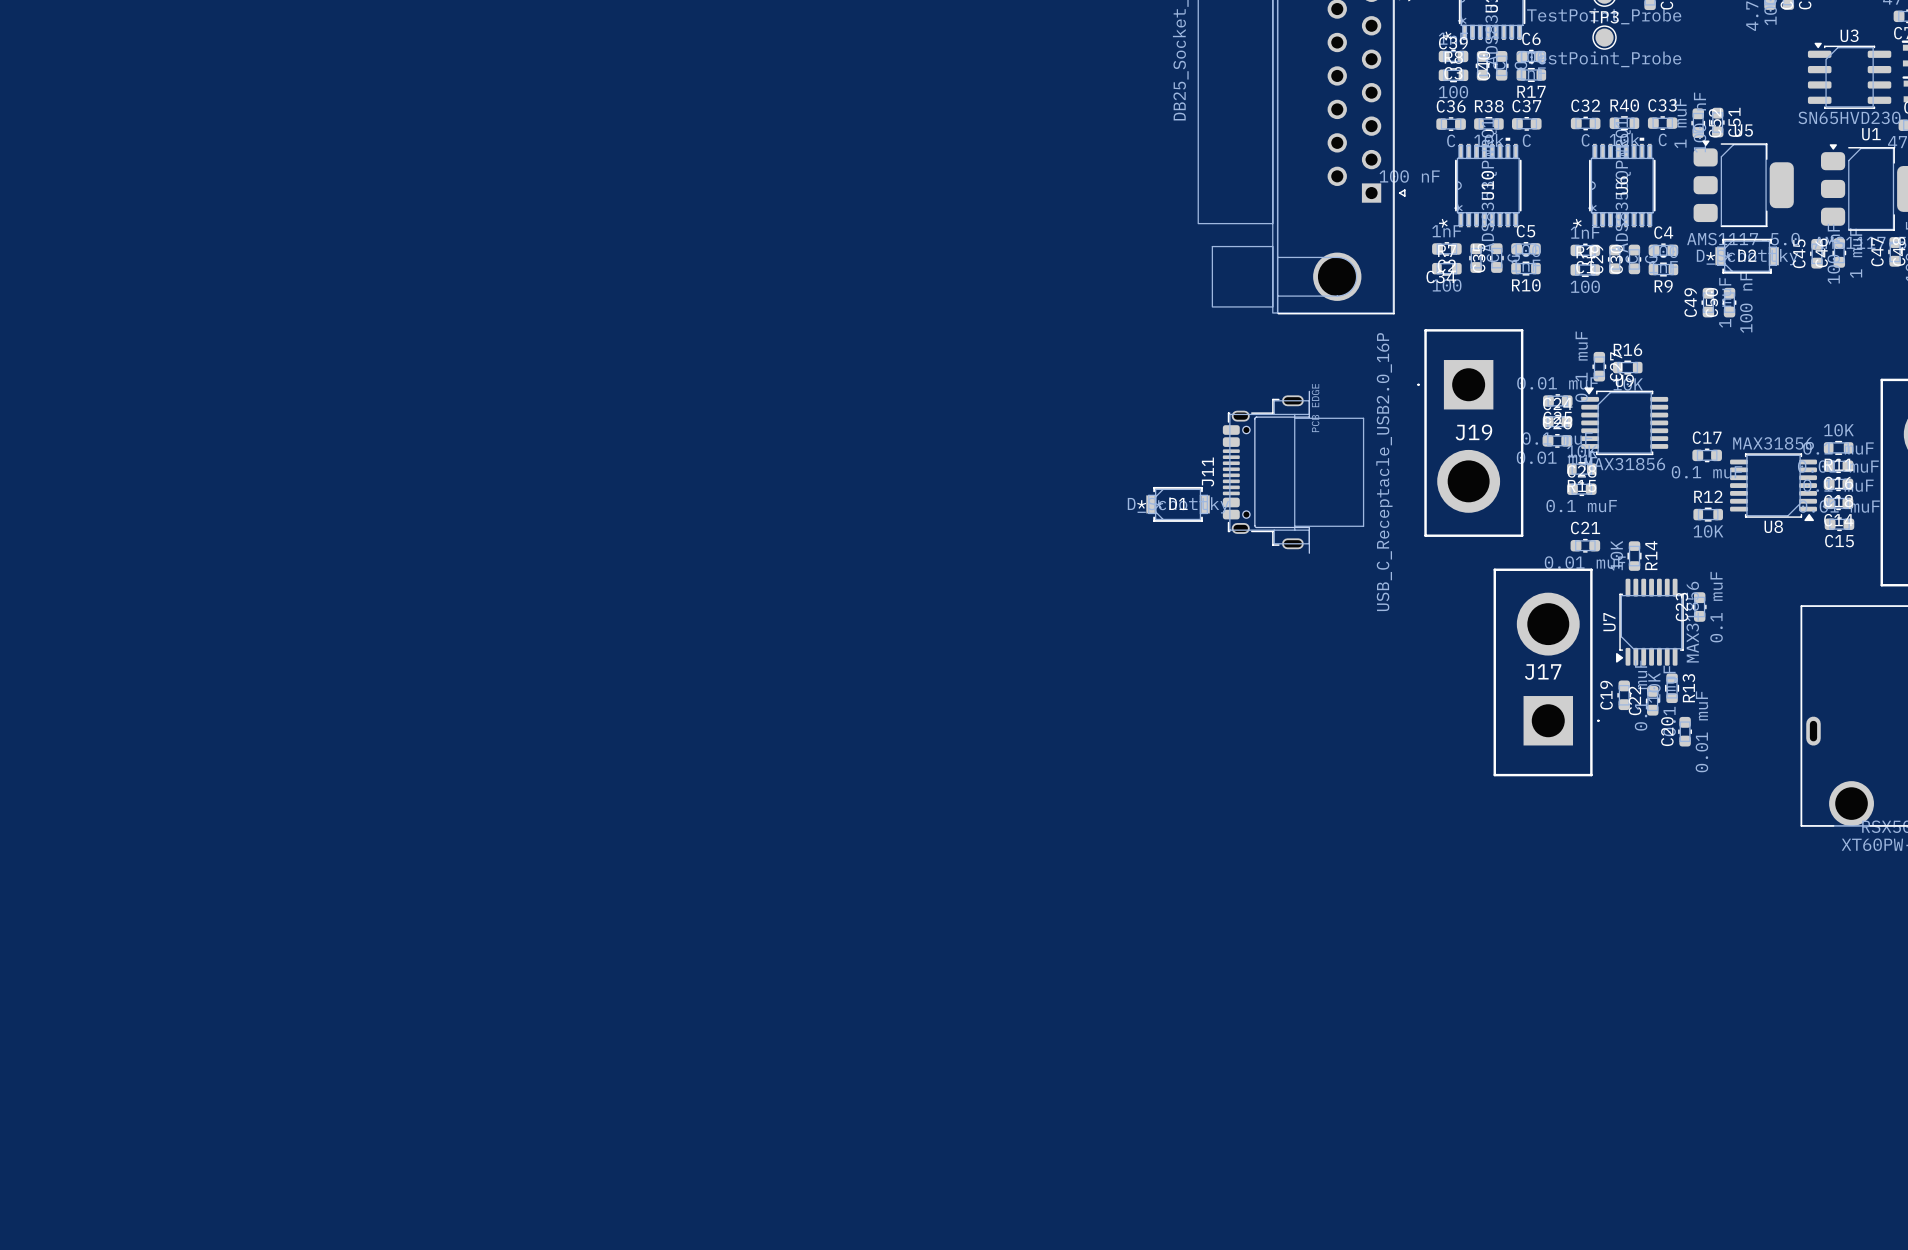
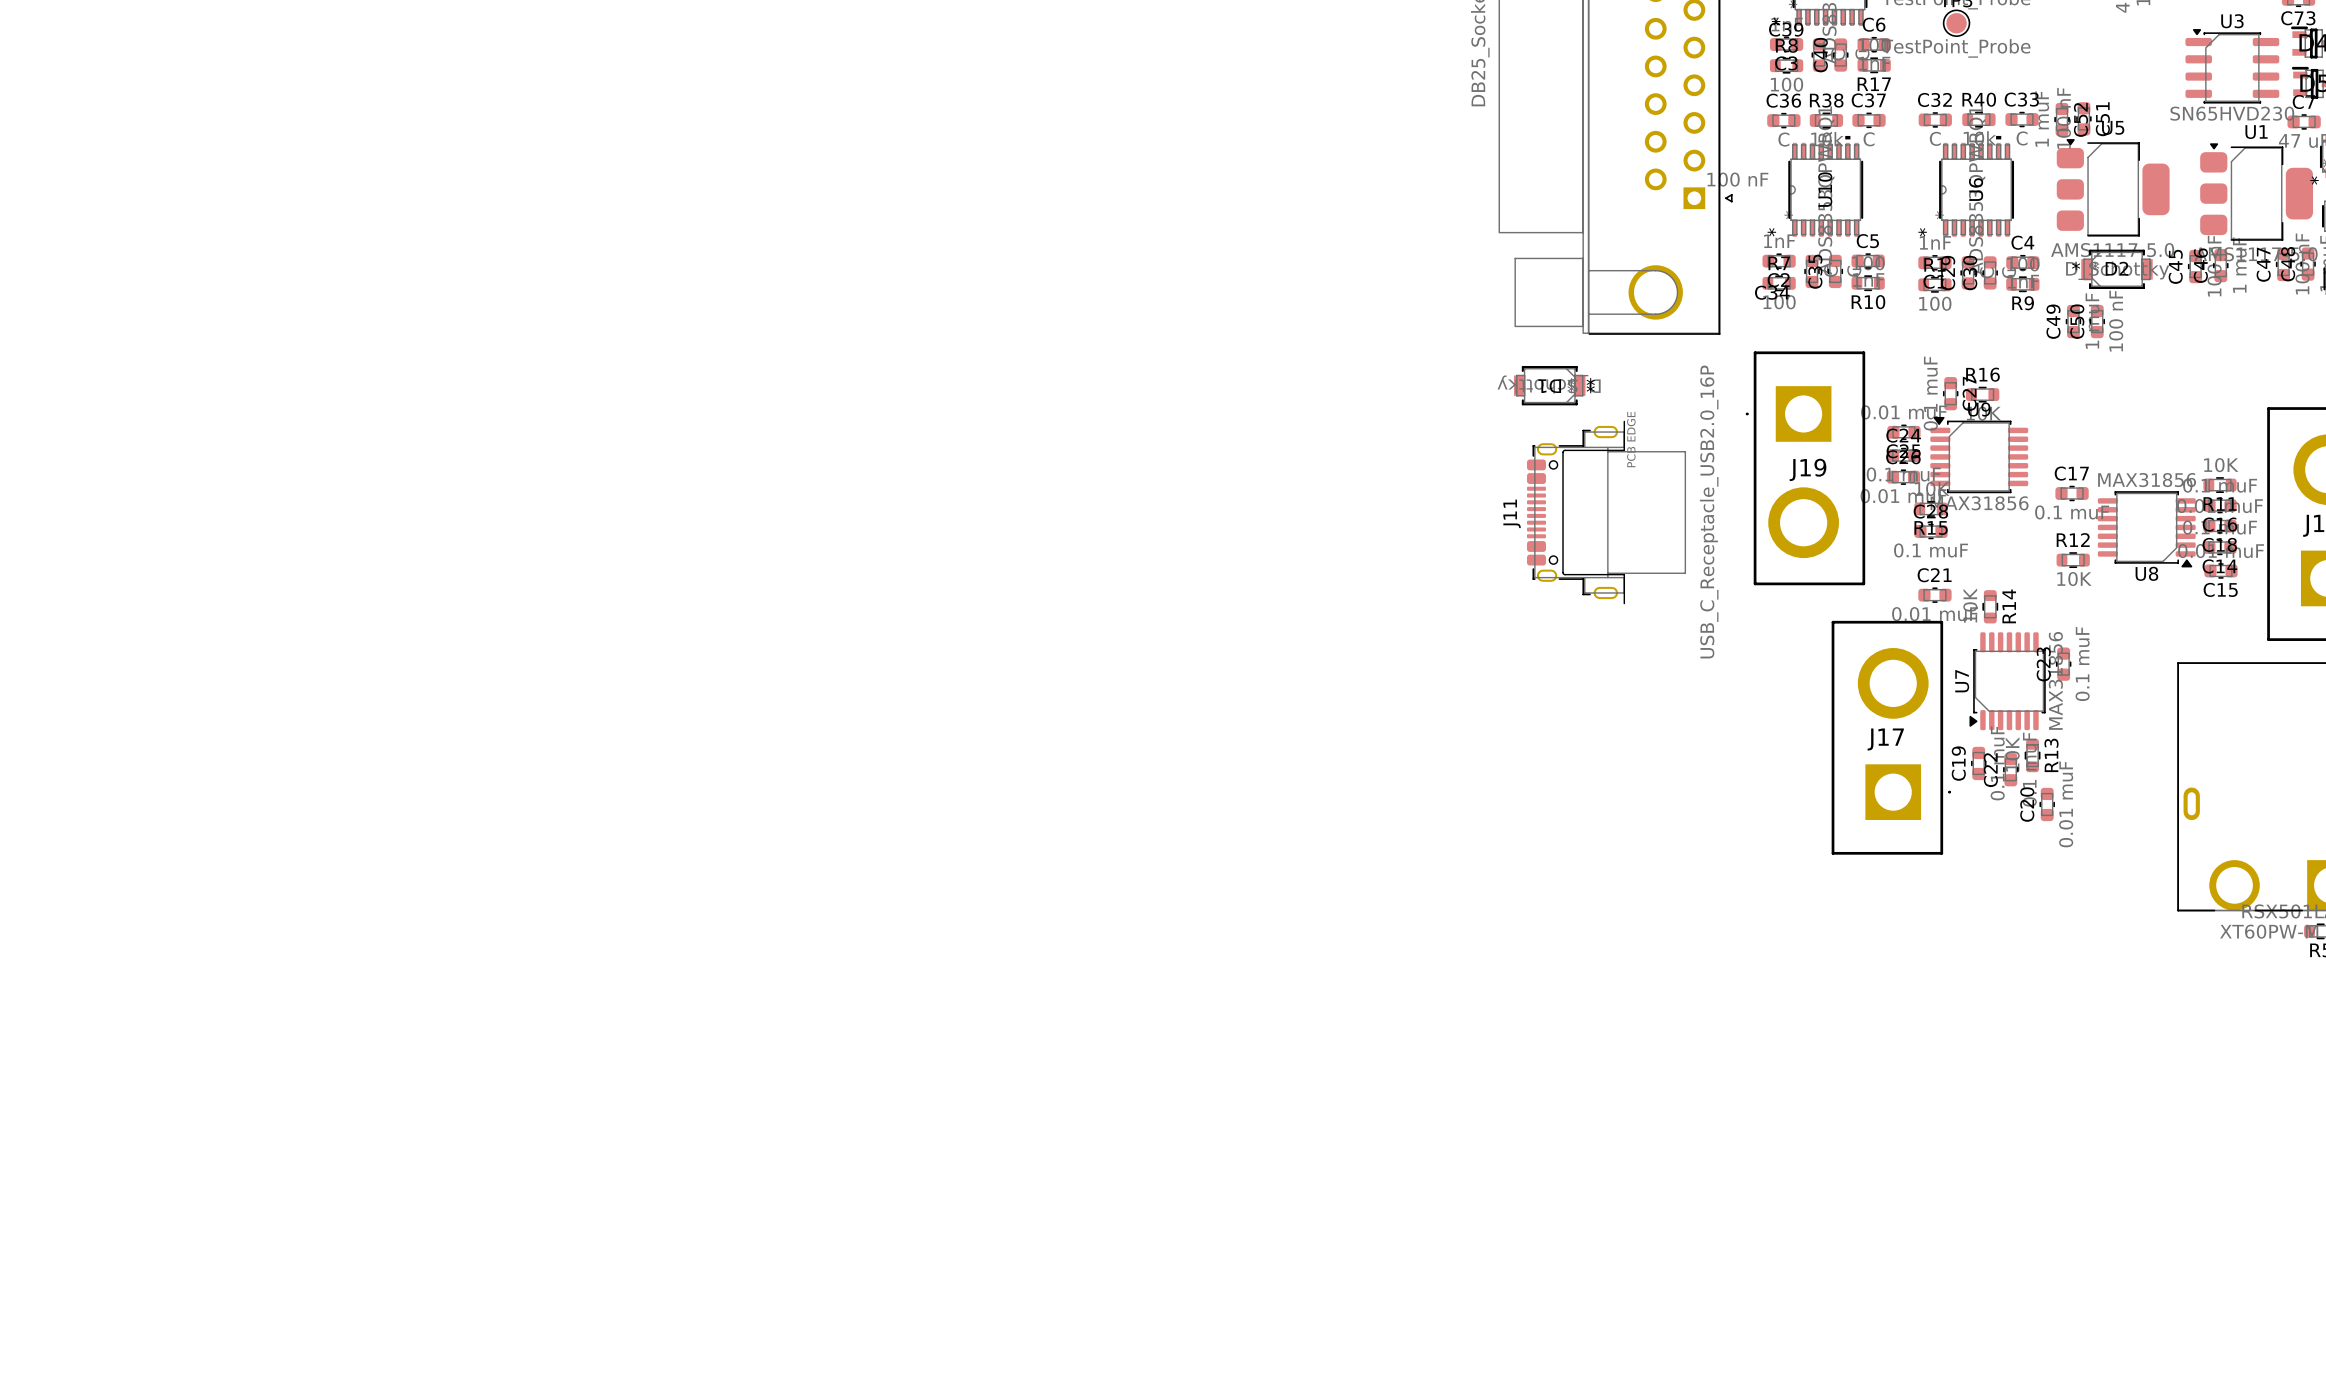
D1 rotation: 0° (1178, 504) -> 180° (1549, 385)
D1 position: (1178, 504) -> (1549, 385)

